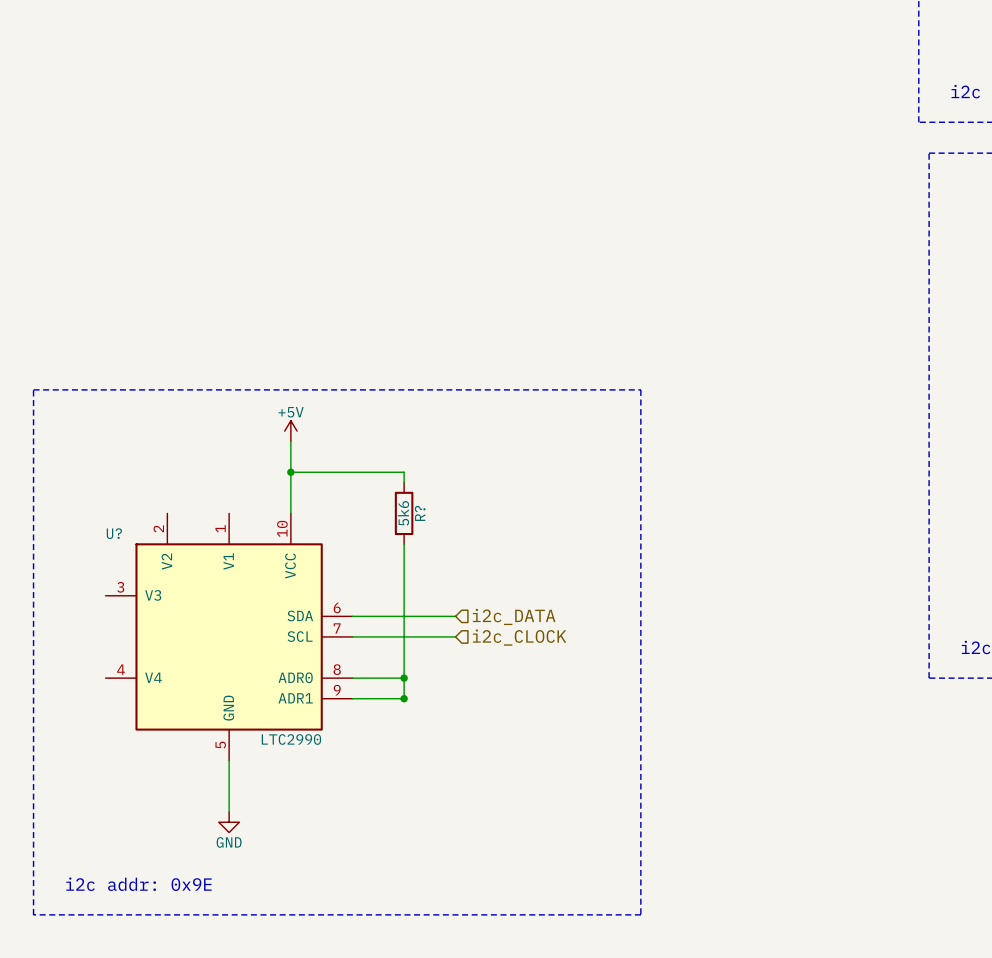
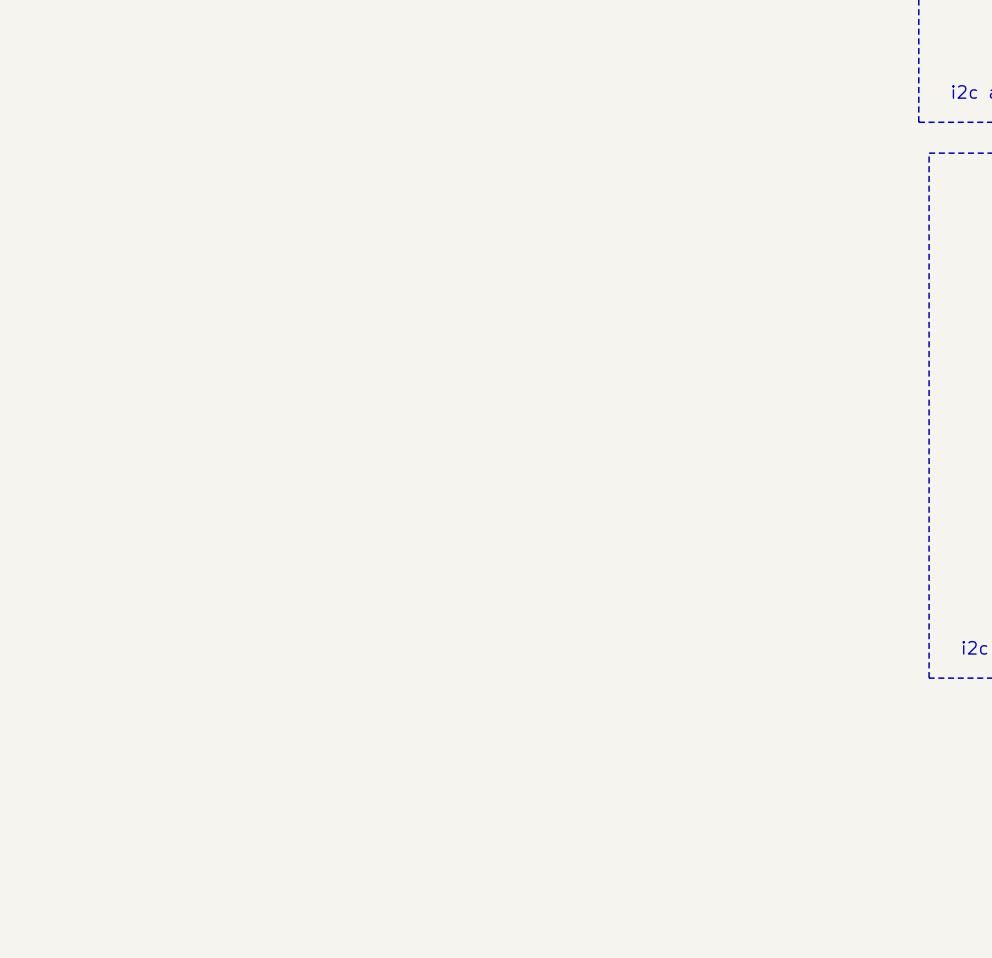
line: (33, 389) (640, 389) (640, 914) (33, 914) (33, 389) -> none
power symbol: +5V (290, 431) -> none
wire: (290, 441) (290, 513) -> none
wire: (290, 472) (404, 472) (404, 482) -> none
junction: (290, 472) -> none
R?: 5k6 (404, 513) -> none
wire: (404, 544) (404, 698) (352, 698) -> none
wire: (352, 616) (455, 616) -> none
hierarchical label: i2c_DATA (514, 616) -> none
U?: LTC2990 (229, 636) -> none
wire: (352, 636) (455, 636) -> none
hierarchical label: i2c_CLOCK (519, 637) -> none
wire: (352, 678) (404, 678) -> none
junction: (404, 678) -> none
junction: (404, 698) -> none
wire: (229, 760) (229, 811) -> none
power symbol: GND (229, 822) -> none
text: i2c addr: 0x9E (138, 884) -> none

